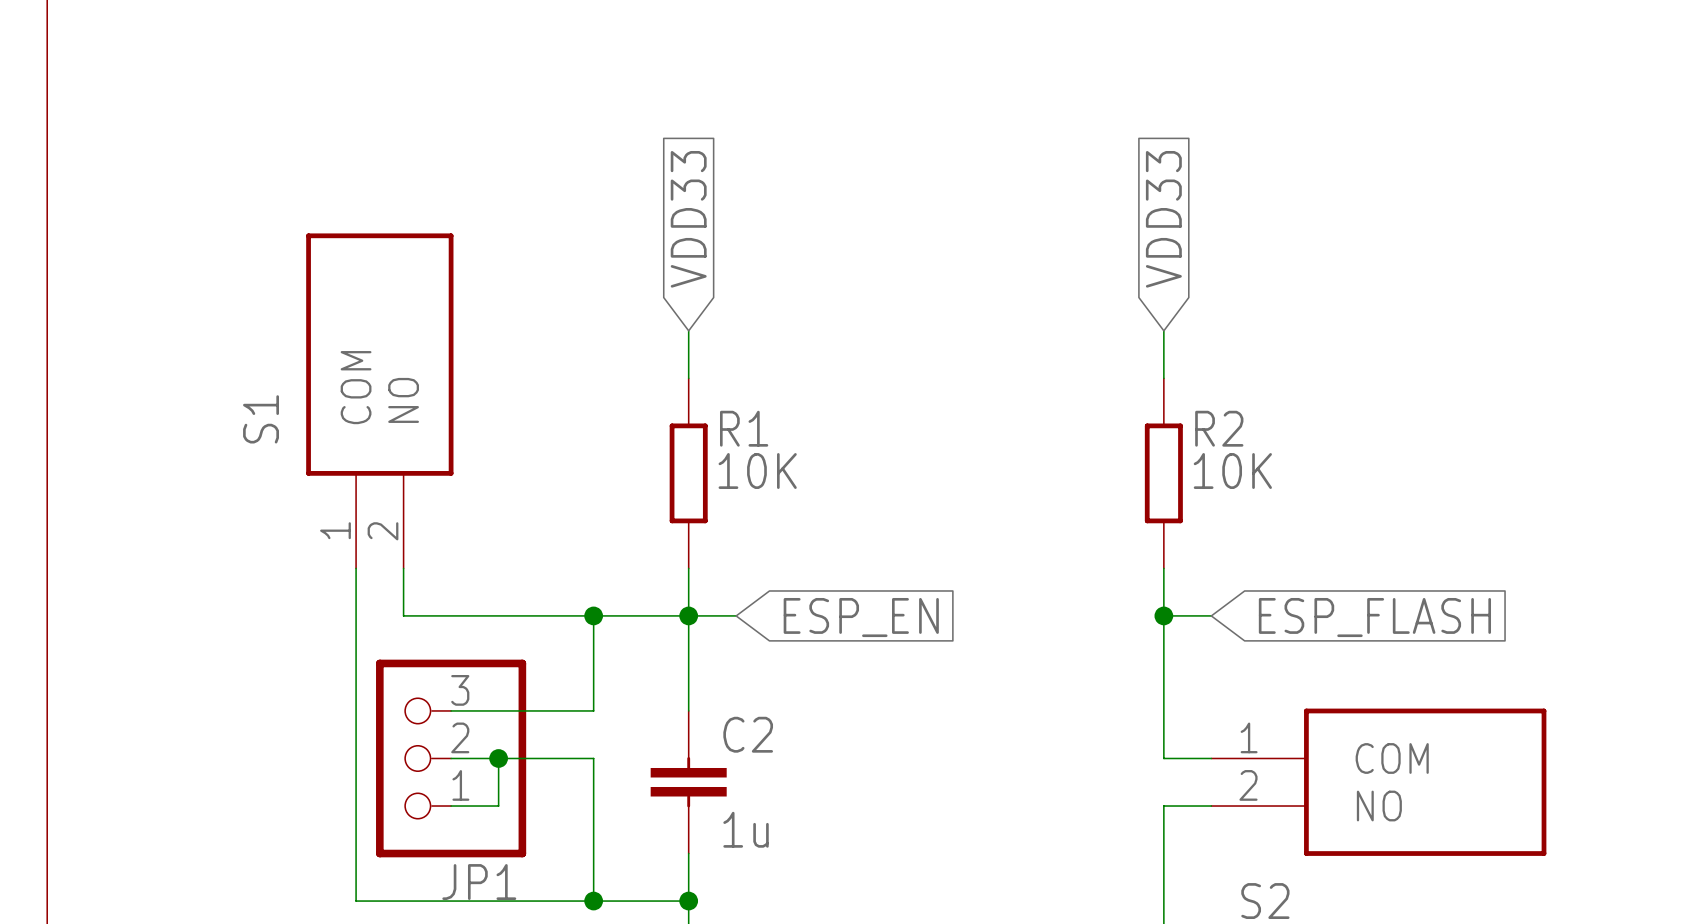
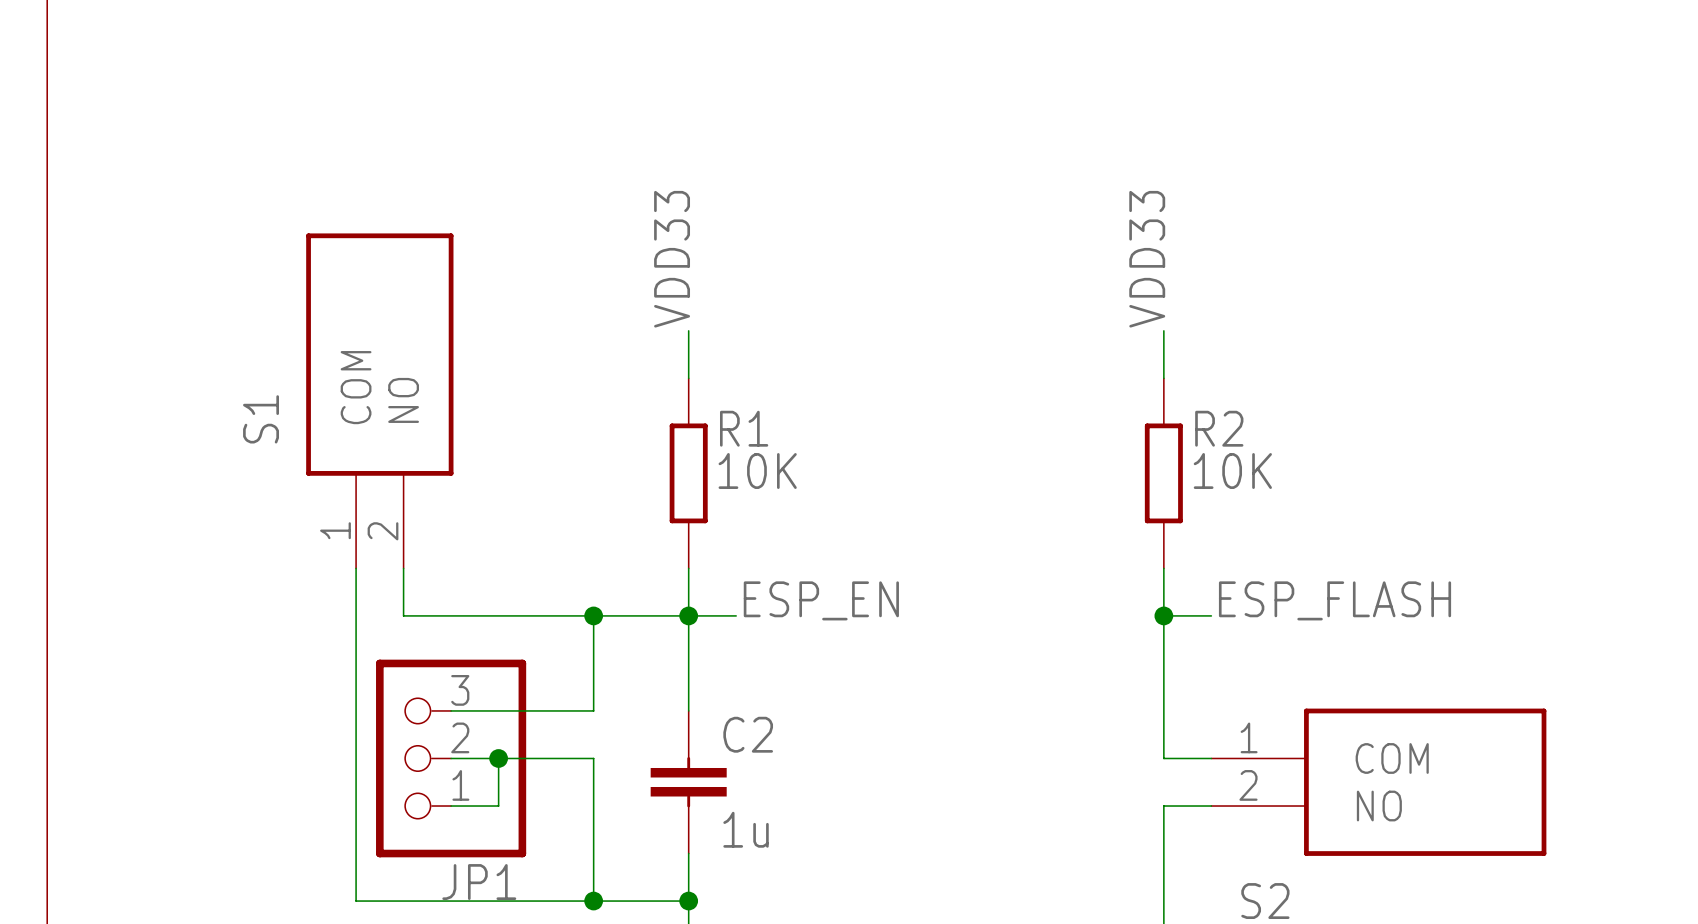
global label: VDD33 (688, 219) -> none
global label: VDD33 (1163, 219) -> none
label: none -> VDD33 (672, 259)
label: none -> VDD33 (1147, 259)
label: none -> ESP_EN (821, 600)
label: none -> ESP_FLASH (1335, 600)
global label: ESP_EN (861, 617) -> none
global label: ESP_FLASH (1374, 617) -> none

